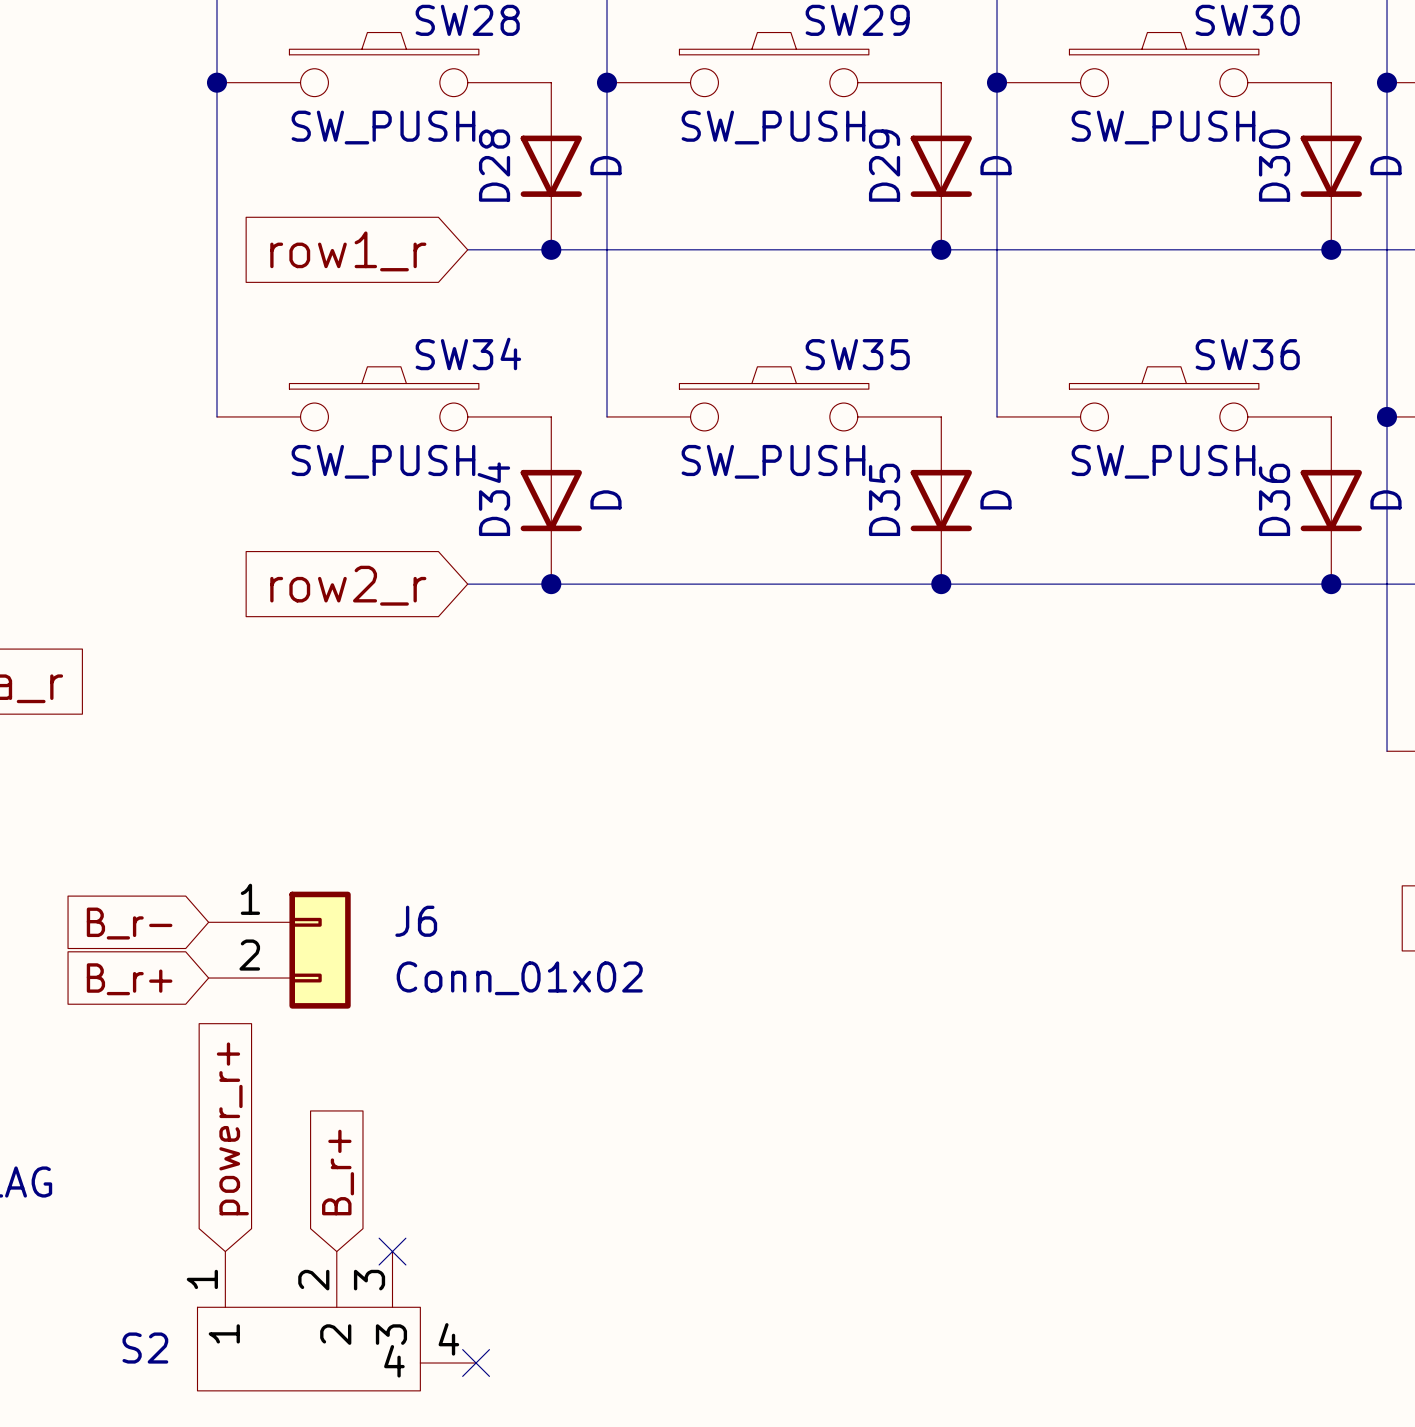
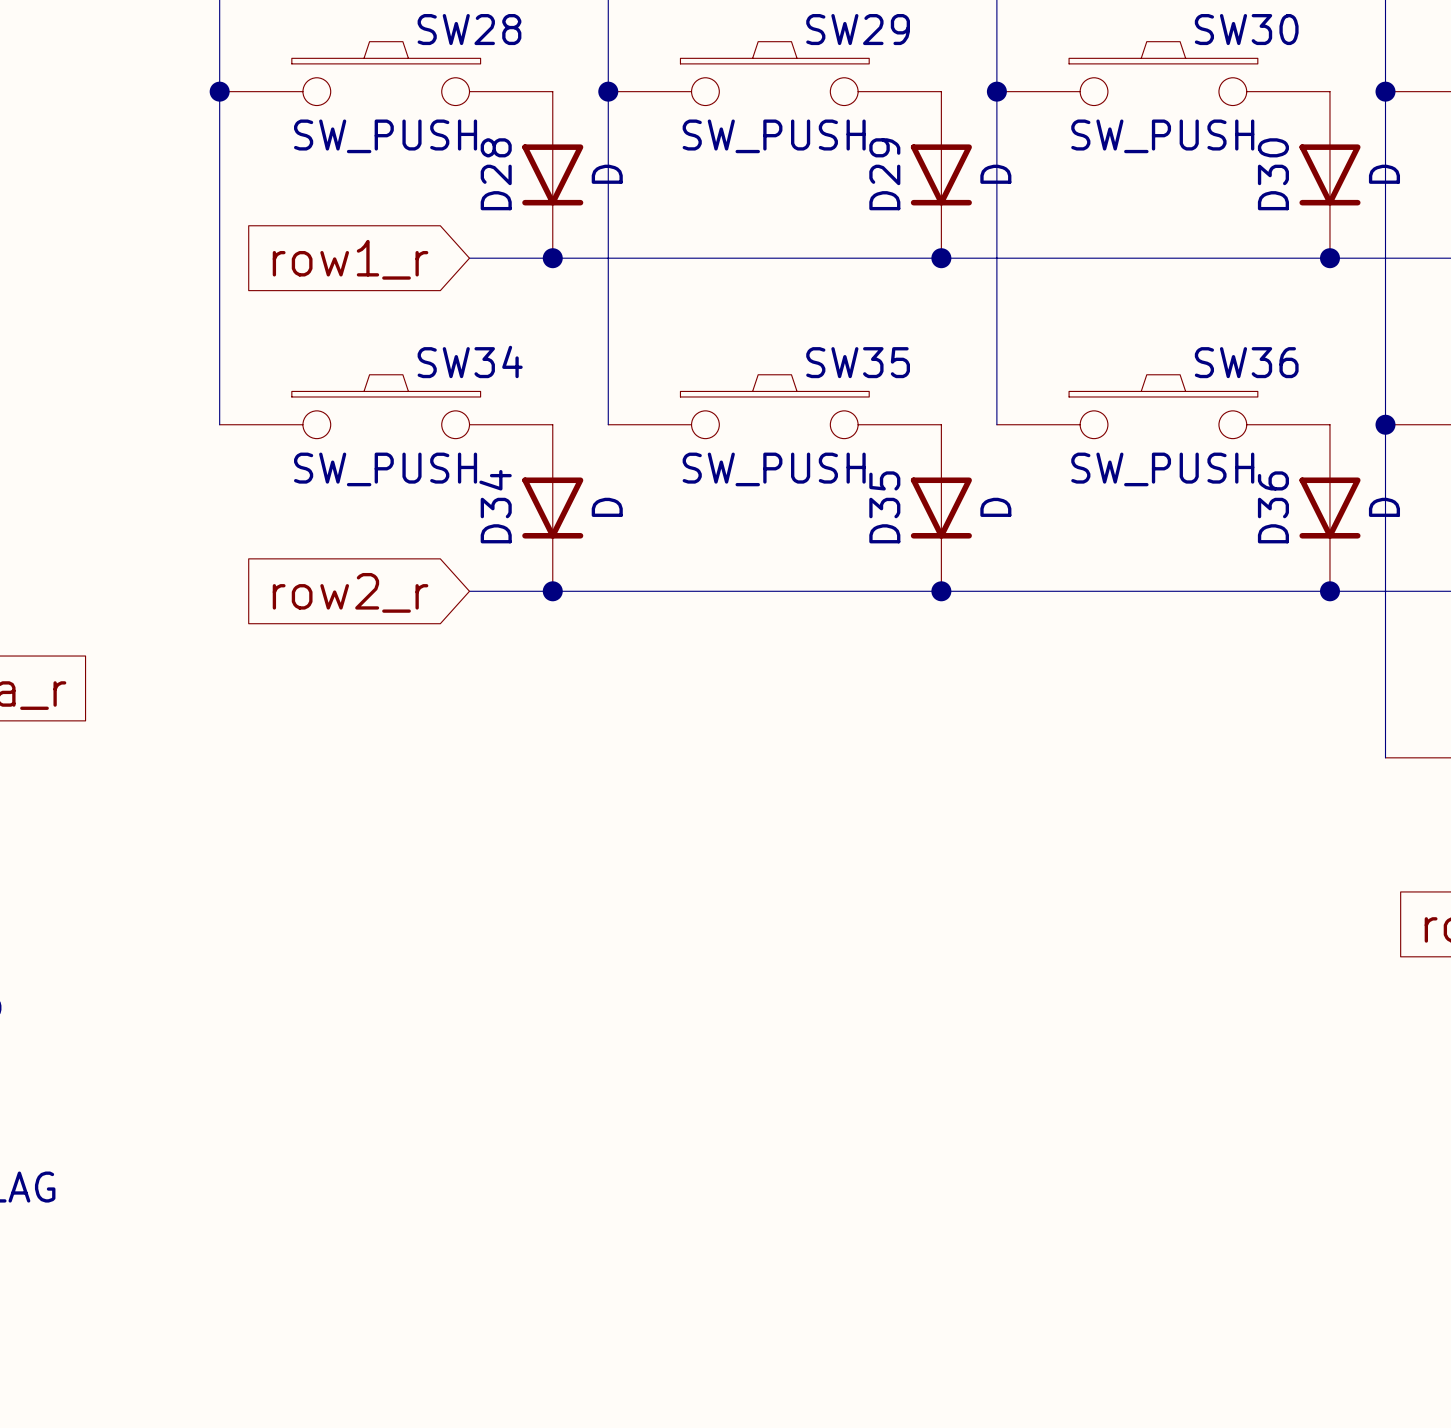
global label: B_r- (129, 923) -> none
J6: Conn_01x02 (279, 950) -> none
global label: B_r+ (129, 979) -> none
global label: power_r+ (232, 1128) -> none
global label: B_r+ (338, 1172) -> none
no-connect mark: (392, 1251) -> none
S2: (336, 1321) -> none
no-connect mark: (476, 1363) -> none

